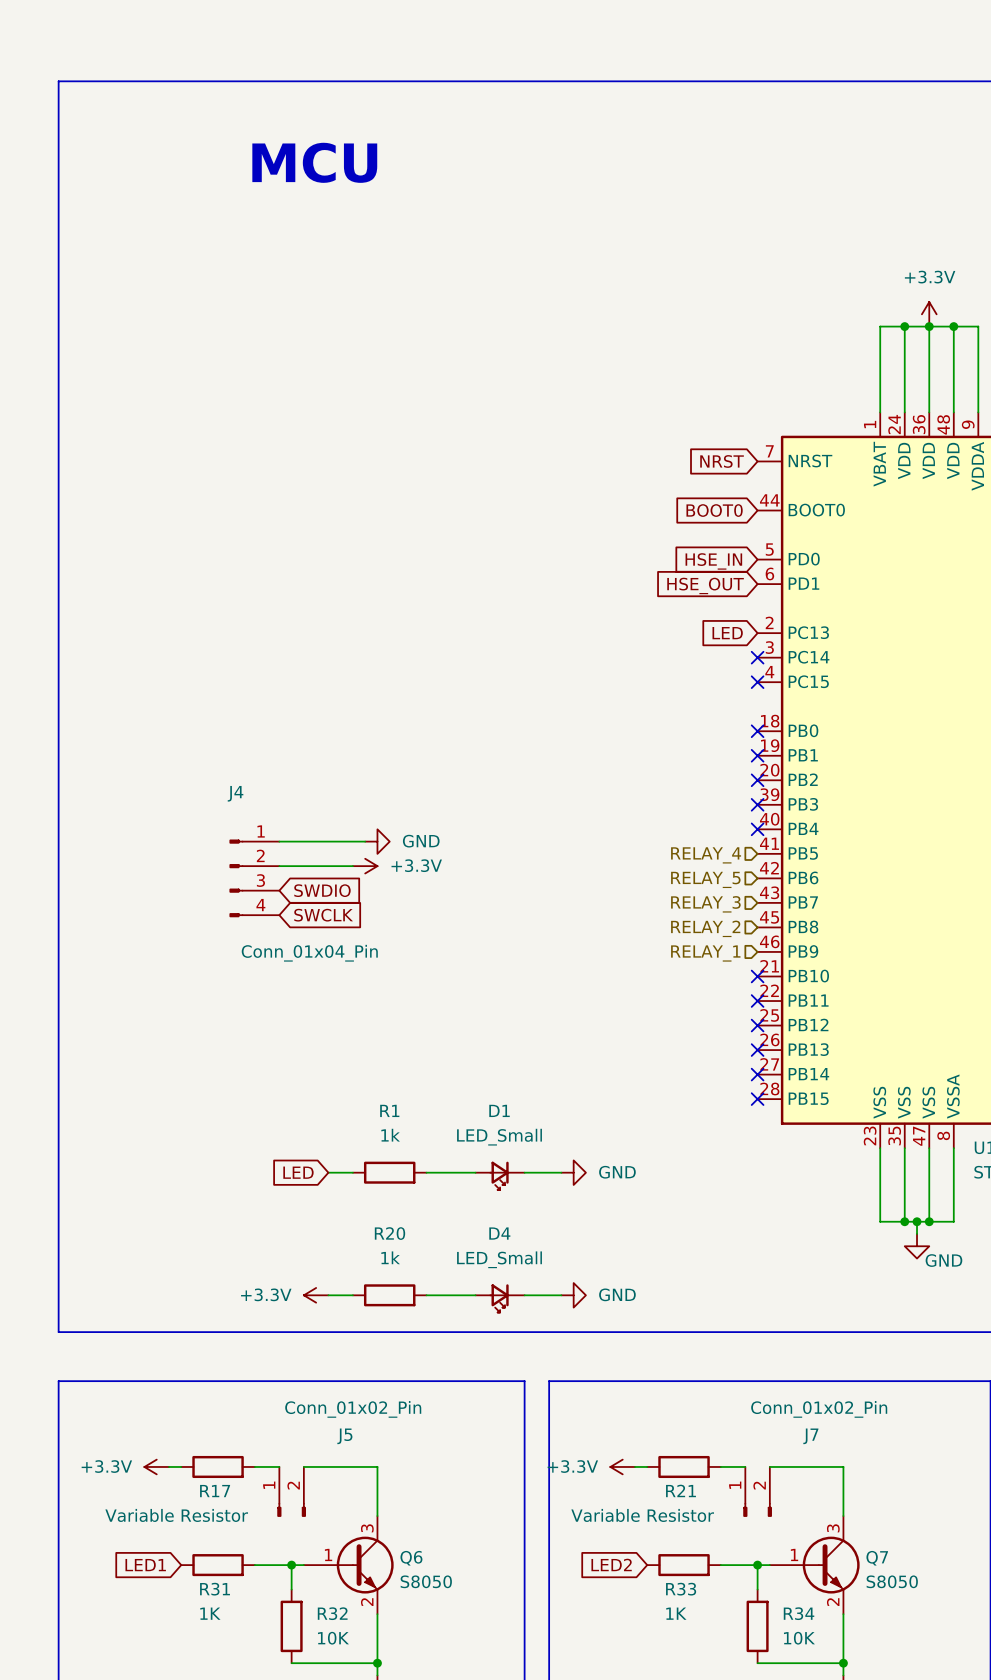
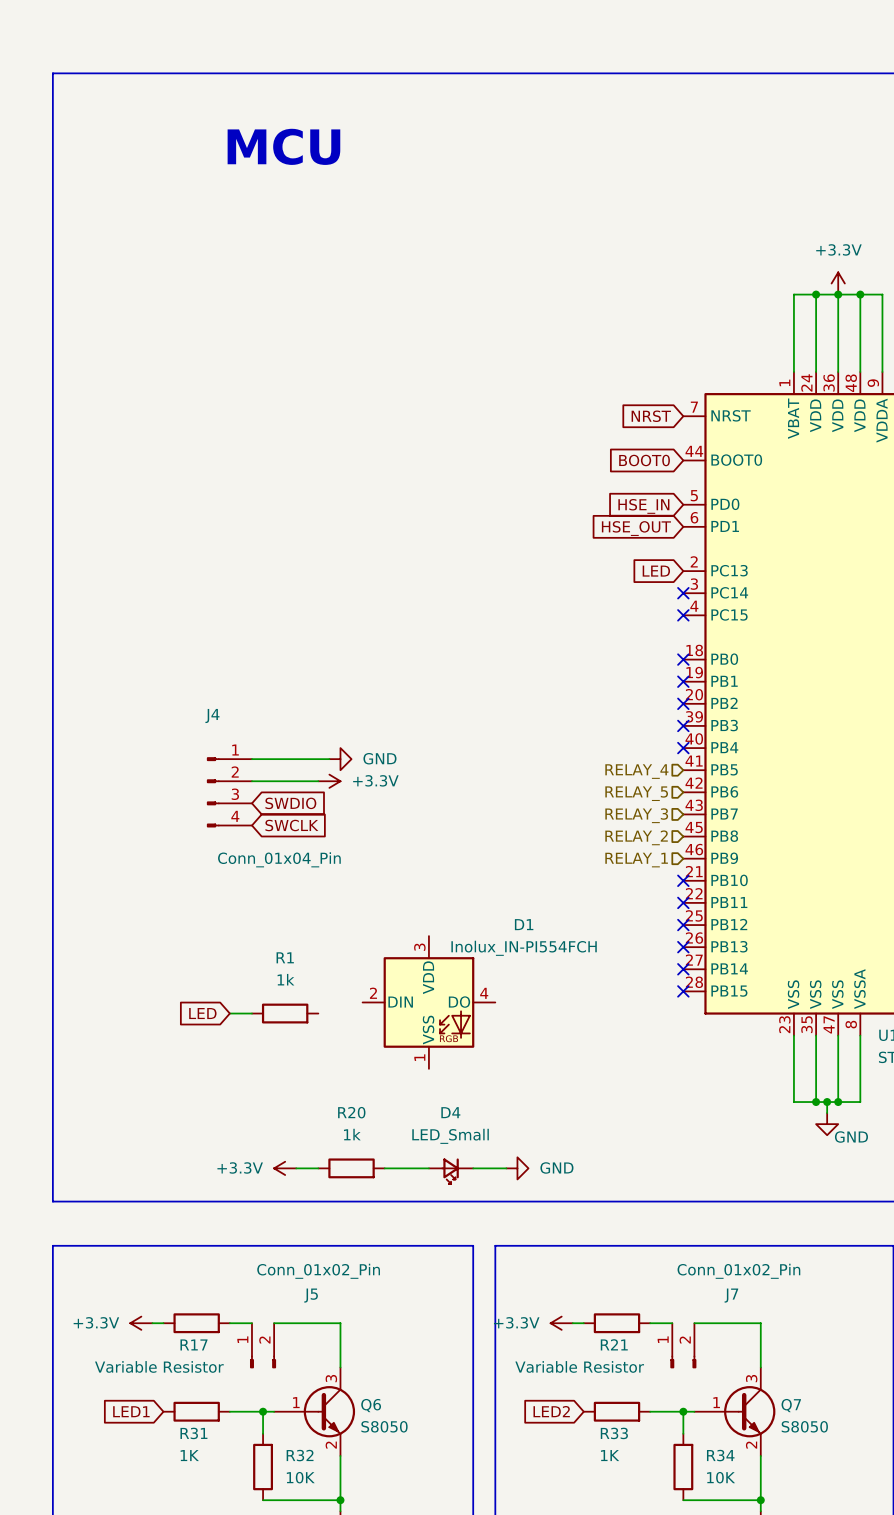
D1 name position: D1 (499, 1110) -> D1 (524, 924)
D1 value: LED_Small (499, 1137) -> Inolux_IN-PI554FCH (524, 948)
D1 symbol: [475, 1161, 525, 1190] -> [362, 936, 496, 1069]
global label position: LED (298, 1172) -> LED (202, 1013)
wire: (328, 1172) (352, 1172) -> (229, 1013) (251, 1013)
R1 position: (389, 1172) -> (285, 1013)
wire: (426, 1172) (475, 1172) -> none
wire: (524, 1172) (561, 1172) -> none
power symbol: GND (573, 1172) -> none

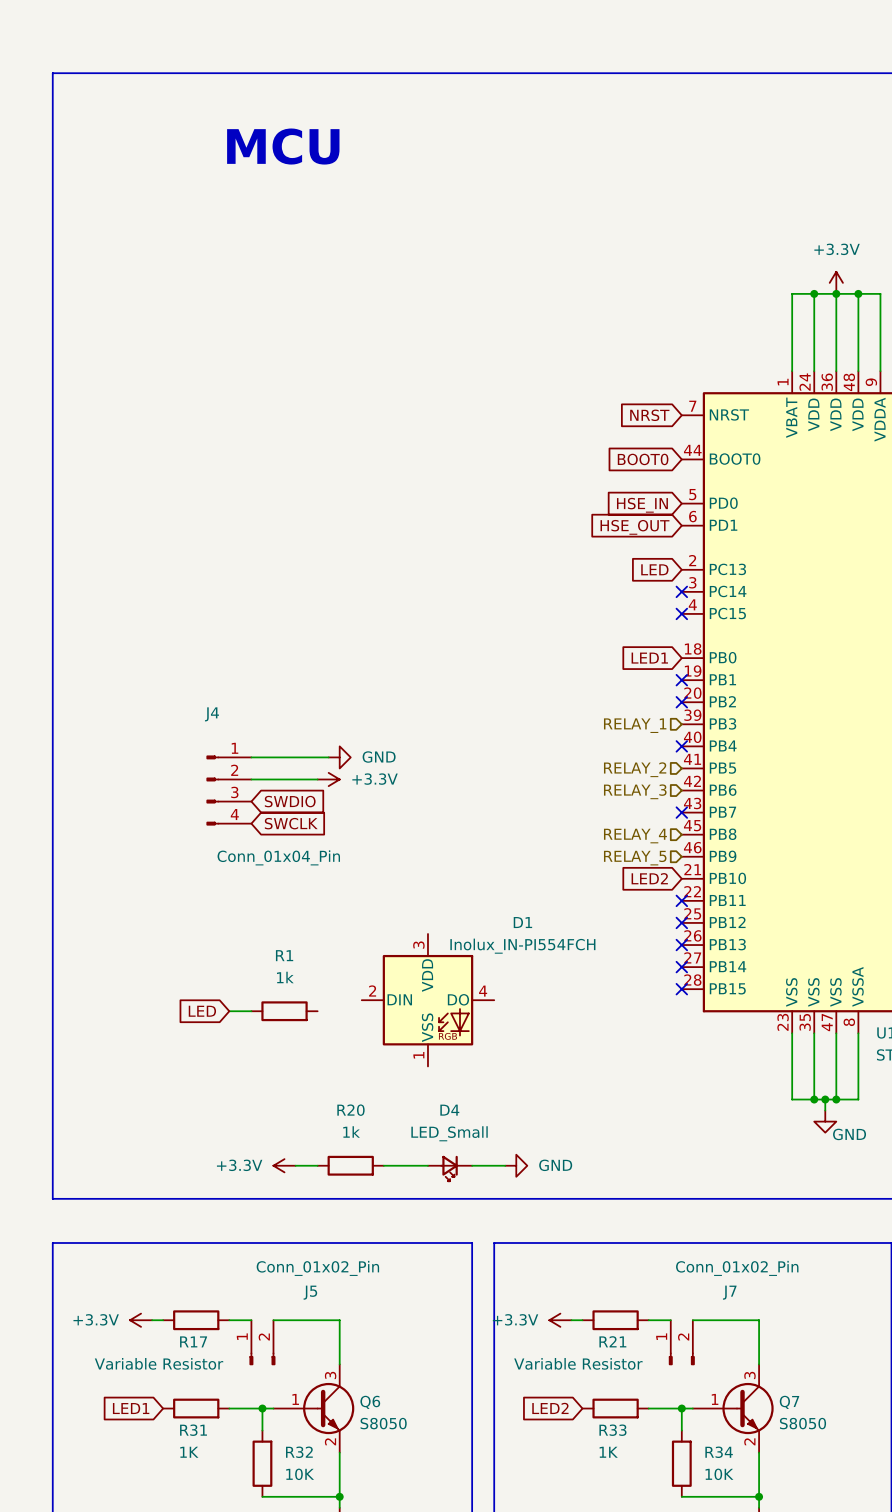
global label: none -> LED1 (649, 658)
no-connect mark: (683, 659) -> none
no-connect mark: (683, 725) -> none
hierarchical label: none -> RELAY_1 (635, 725)
hierarchical label: RELAY_4 (636, 771) -> RELAY_2 (635, 769)
hierarchical label: RELAY_5 (636, 793) -> RELAY_3 (635, 791)
no-connect mark: none -> (681, 812)
hierarchical label: RELAY_3 (636, 815) -> none
hierarchical label: RELAY_2 (636, 837) -> RELAY_4 (635, 836)
hierarchical label: RELAY_1 (636, 860) -> RELAY_5 (635, 858)
global label: none -> LED2 (649, 878)
no-connect mark: (683, 880) -> none

